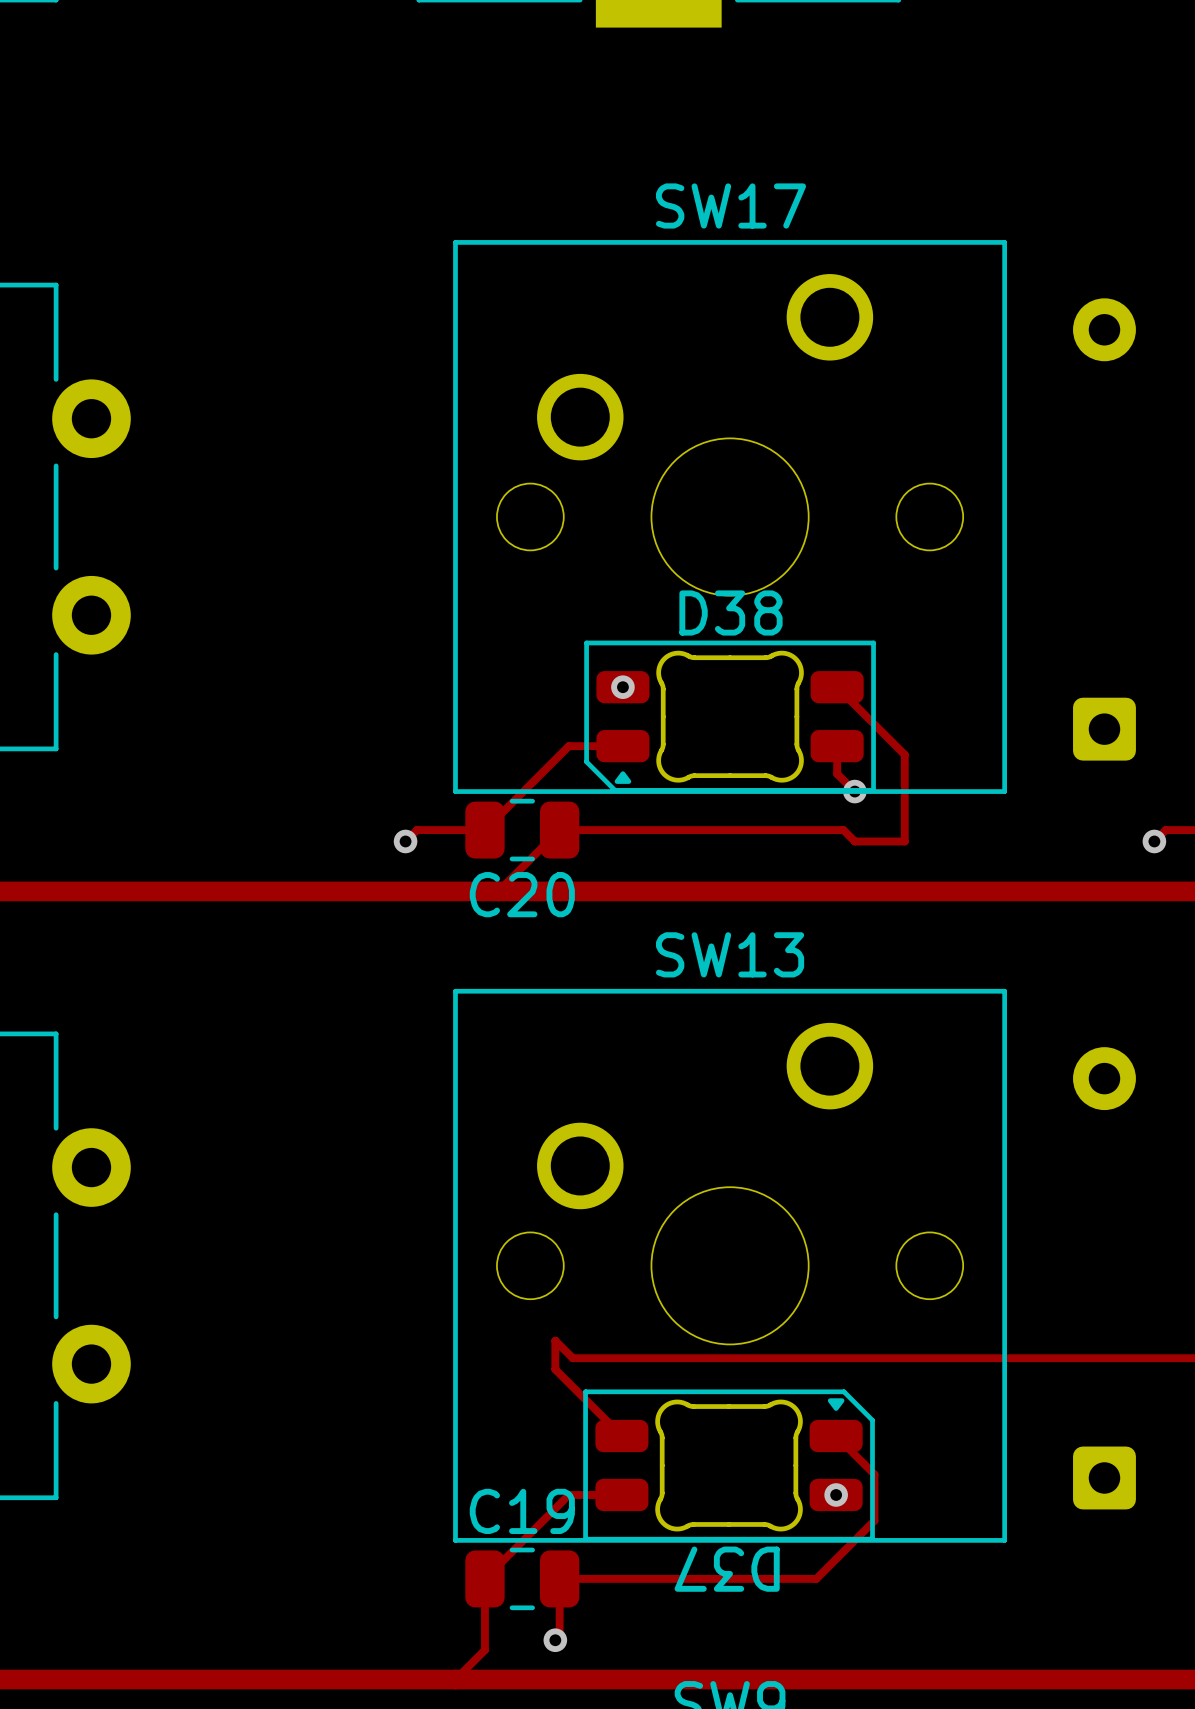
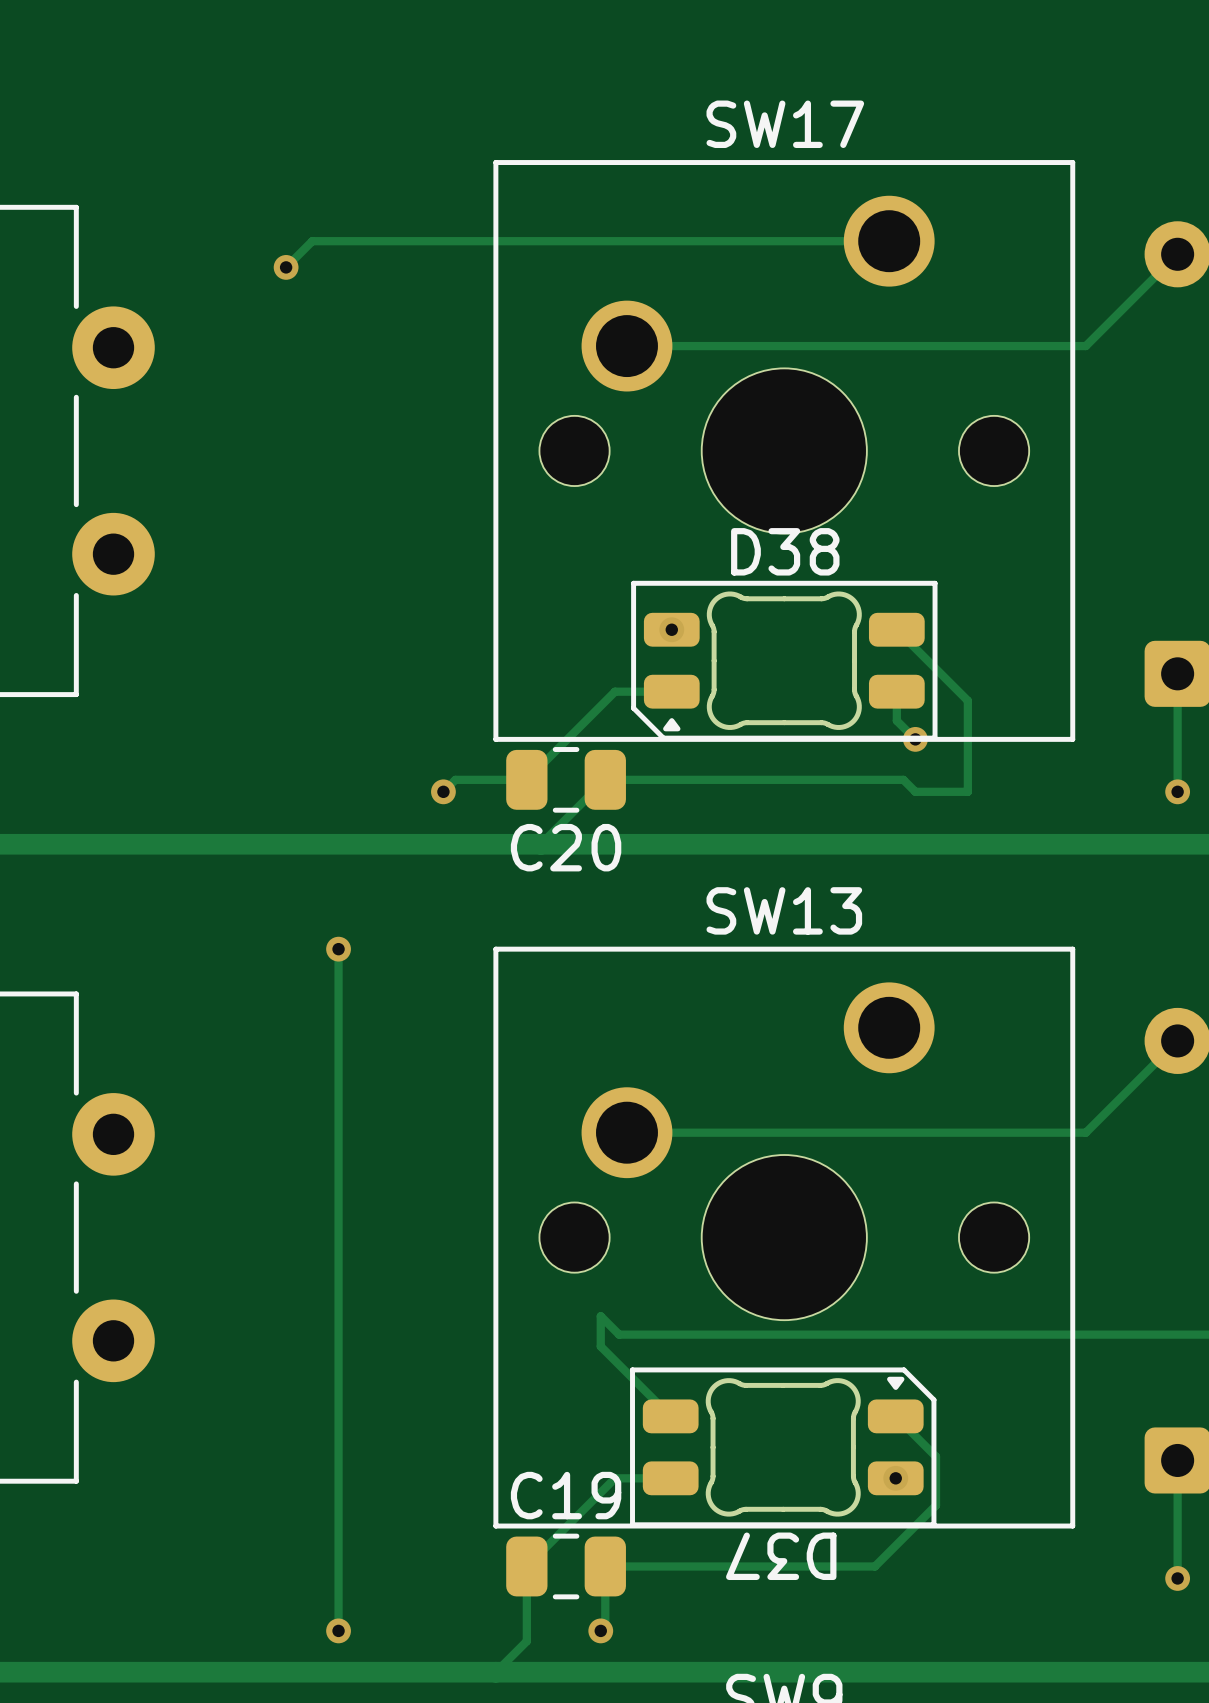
track: none -> (889, 241) (312, 241) (286, 267)
track: none -> (1177, 254) (1085, 346) (626, 346)
via: none -> (286, 267)
track: none -> (1177, 673) (1177, 791)
via: none -> (1177, 791)
track: none -> (338, 949) (338, 1630)
via: none -> (338, 949)
track: none -> (1177, 1040) (1085, 1132) (626, 1132)
track: none -> (1177, 1460) (1177, 1578)
via: none -> (1177, 1578)
via: none -> (338, 1630)

